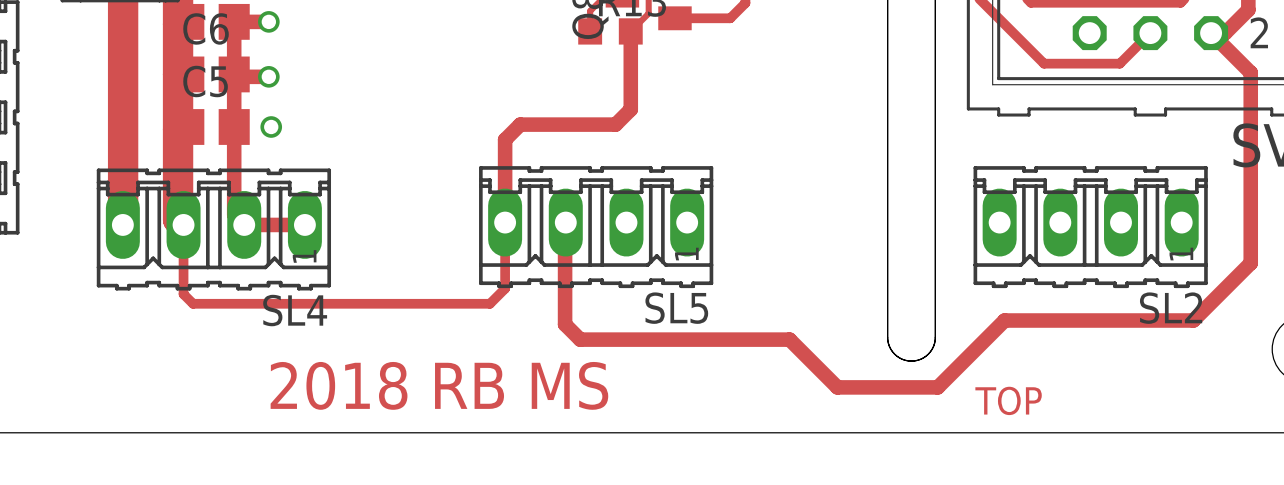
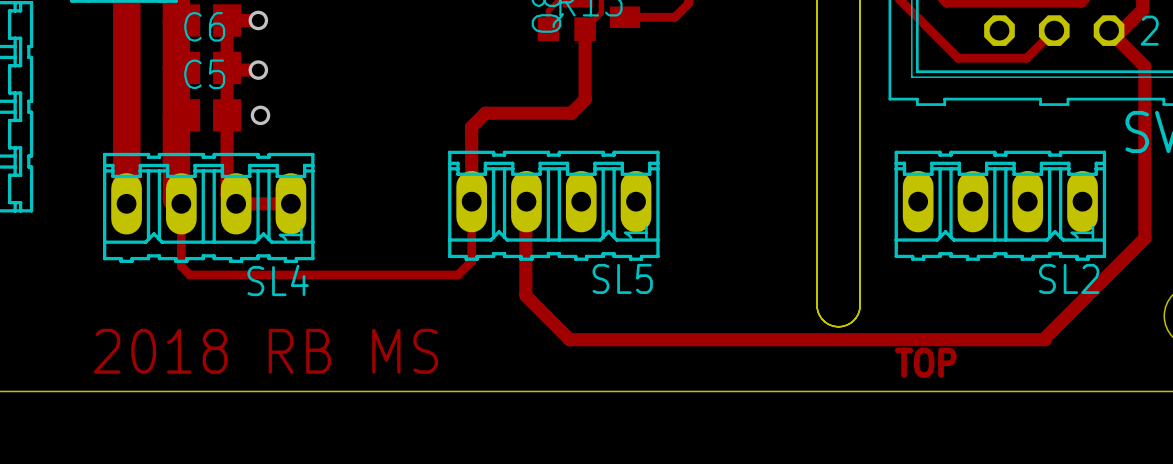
track: (1193, 320) (1004, 320) (937, 387) (837, 387) (789, 339) (580, 339) (565, 324) -> (1093, 290) (1045, 339) (569, 339) (525, 293)
text position: 2018 RB MS (439, 385) -> 2018 RB MS (265, 351)

